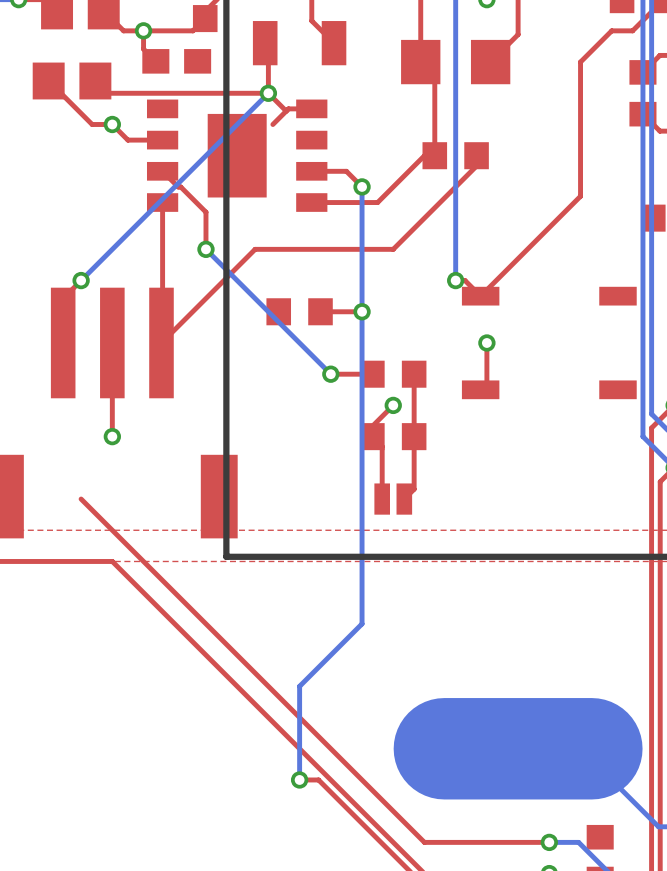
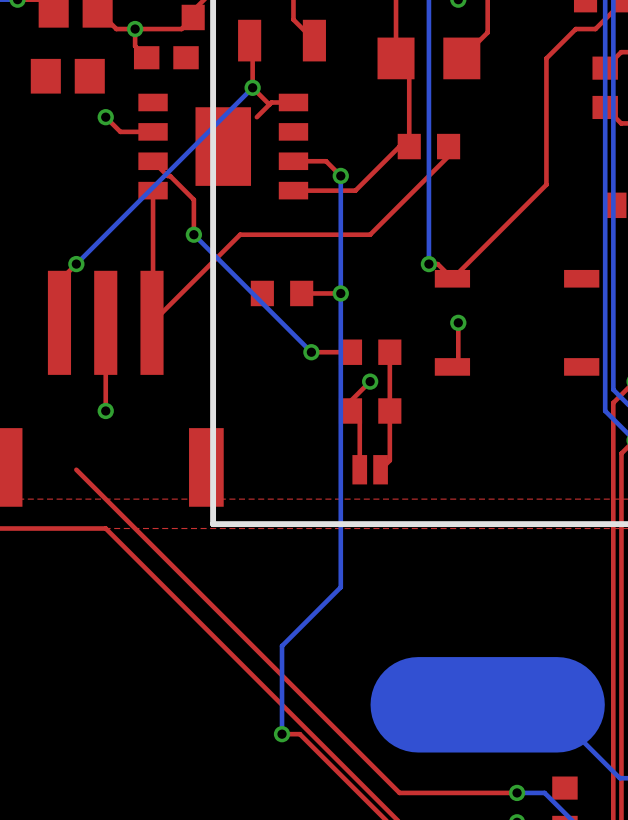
top track: (48, 80) (92, 124) (112, 124) -> none
top track: (95, 80) (107, 93) (268, 93) -> none

